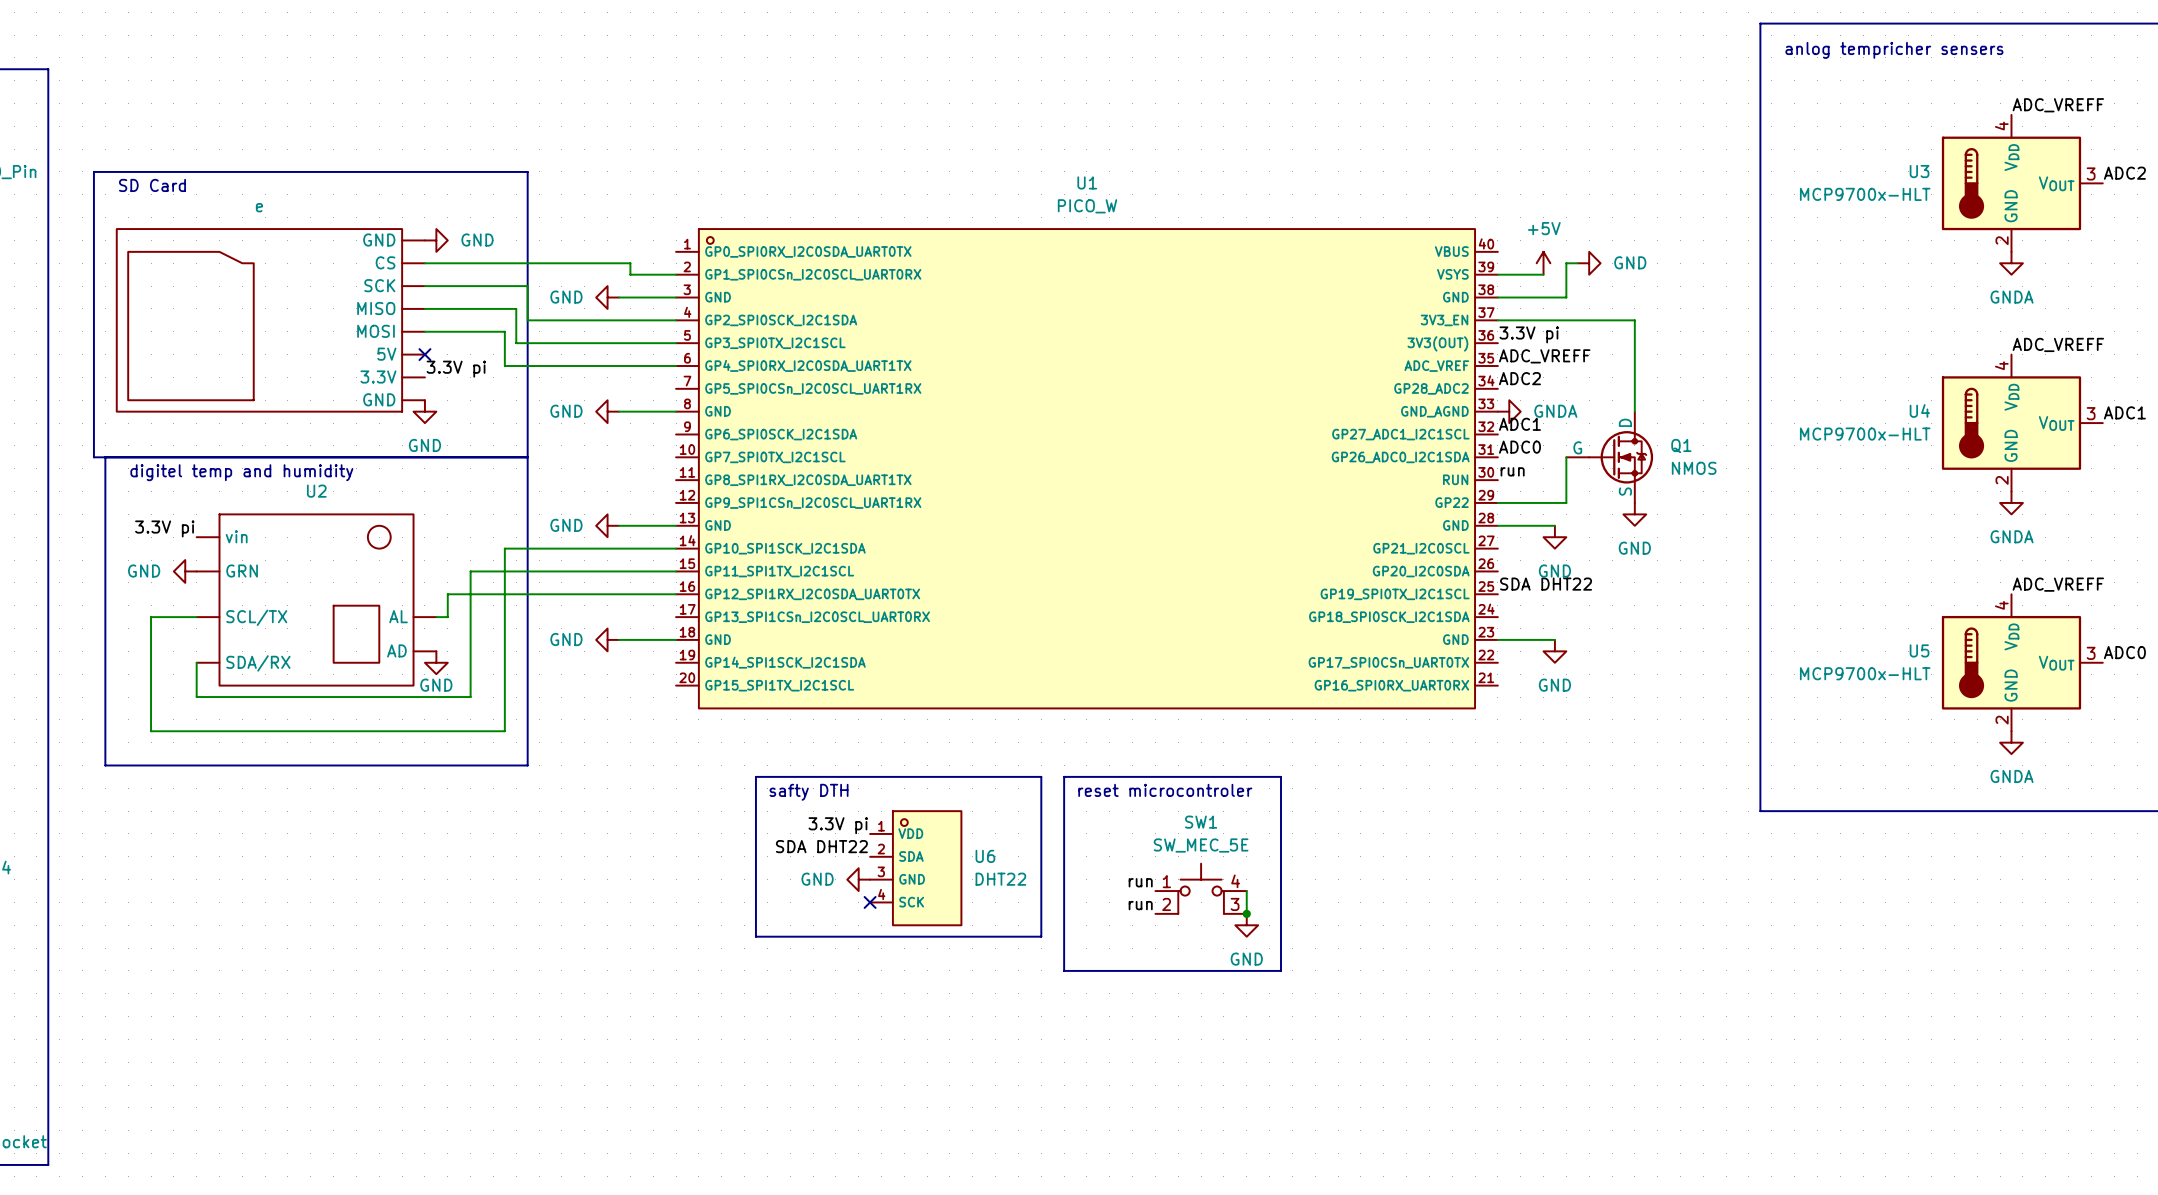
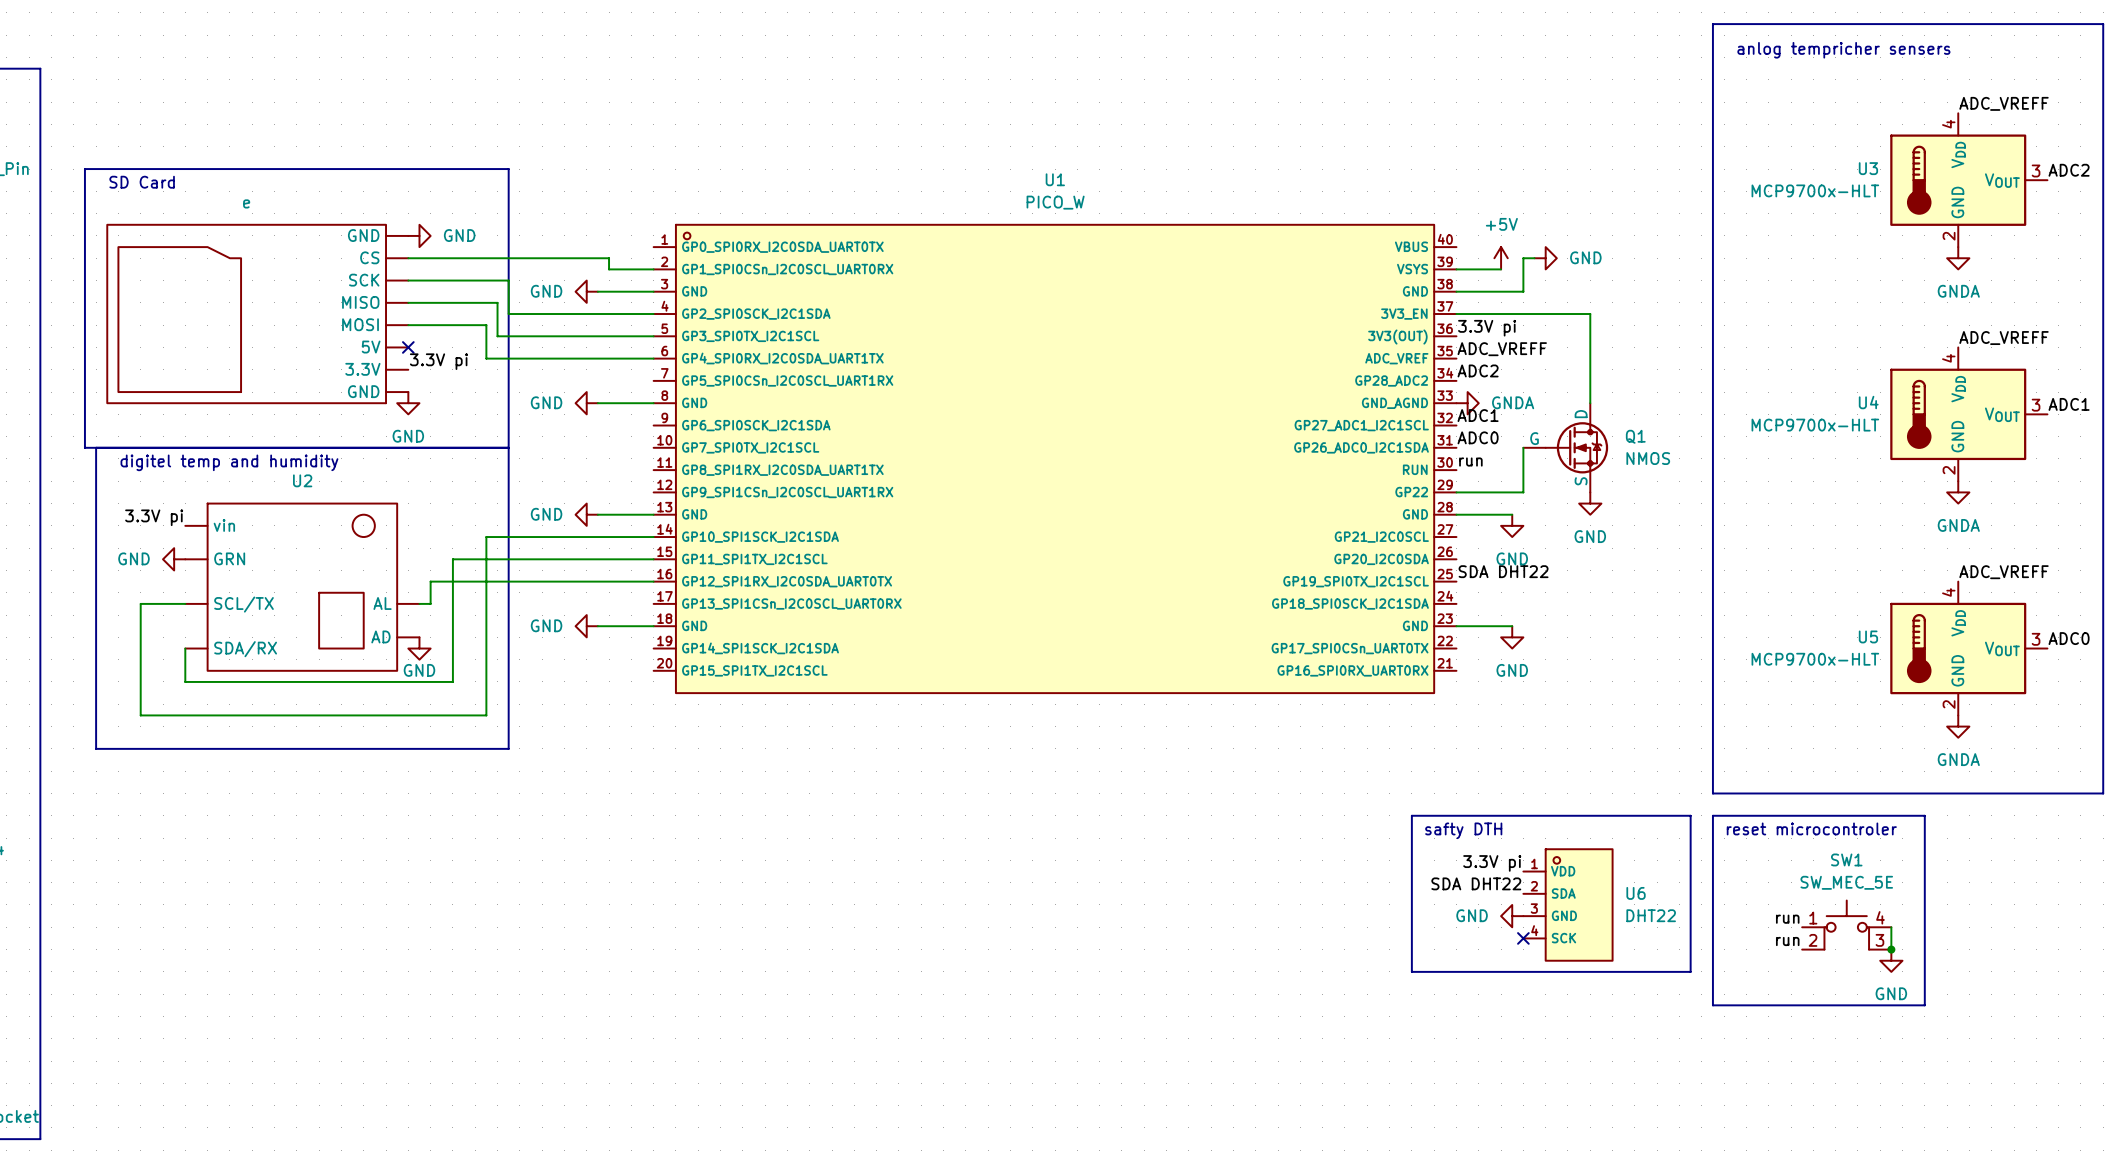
line: (755, 776) (1041, 776) (1041, 936) (755, 936) (755, 776) -> none
line: (1064, 776) (1281, 776) (1281, 970) (1064, 970) (1064, 776) -> none
text: reset microcontroler (1165, 790) -> none
text: safty DTH (809, 792) -> none
label: 3.3V pi (838, 825) -> none
line: none -> (1411, 815) (1690, 815) (1690, 971) (1411, 971) (1411, 815)
line: none -> (1712, 815) (1712, 1005) (1924, 1005) (1924, 815) (1712, 815)
label: SDA DHT22 (821, 846) -> none
text: none -> reset microcontroler (1811, 828)
text: none -> safty DTH (1463, 830)
U6 position: (915, 868) -> (1567, 904)
power symbol: GND (858, 879) -> none
label: run (1140, 882) -> none
label: none -> 3.3V pi (1492, 863)
SW1 position: (1201, 888) -> (1846, 925)
wire: (1246, 891) (1246, 913) -> none
no-connect mark: (870, 902) -> none
label: none -> SDA DHT22 (1476, 883)
label: run (1140, 905) -> none
junction: (1246, 913) -> none
power symbol: GND (1246, 925) -> none
power symbol: none -> GND (1512, 916)
label: none -> run (1787, 919)
wire: none -> (1891, 927) (1891, 949)
no-connect mark: none -> (1523, 938)
label: none -> run (1787, 941)
junction: none -> (1891, 949)
power symbol: none -> GND (1891, 960)

